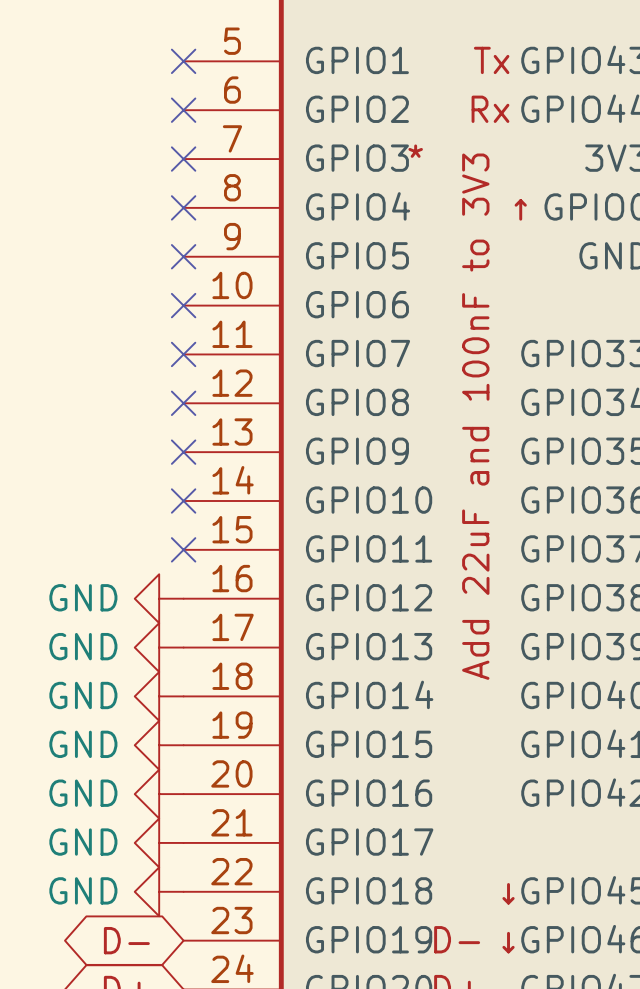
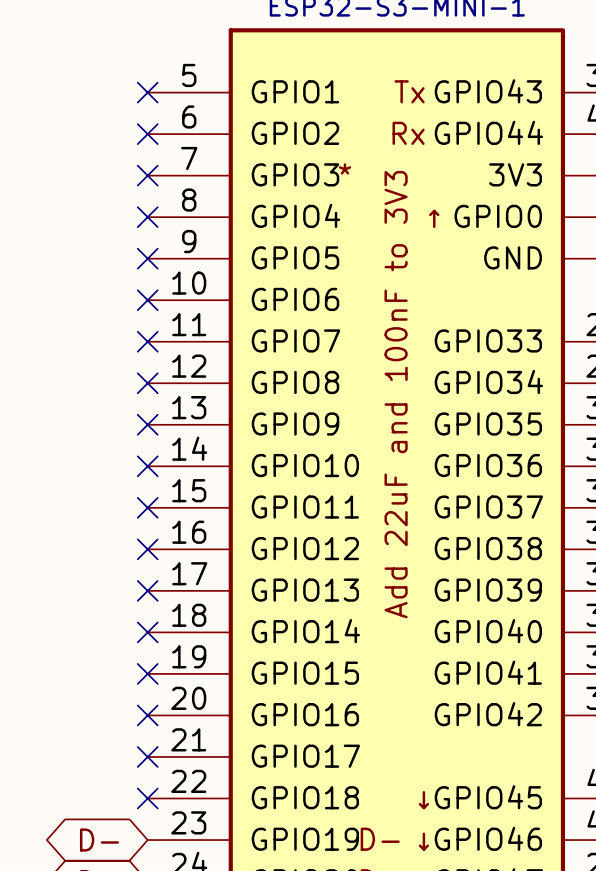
power symbol: GND (159, 598) -> none
no-connect mark: none -> (147, 549)
power symbol: GND (159, 647) -> none
no-connect mark: none -> (147, 590)
power symbol: GND (159, 696) -> none
no-connect mark: none -> (147, 632)
power symbol: GND (159, 745) -> none
no-connect mark: none -> (147, 673)
power symbol: GND (159, 794) -> none
no-connect mark: none -> (147, 715)
power symbol: GND (159, 842) -> none
no-connect mark: none -> (147, 756)
power symbol: GND (159, 891) -> none
no-connect mark: none -> (147, 798)

